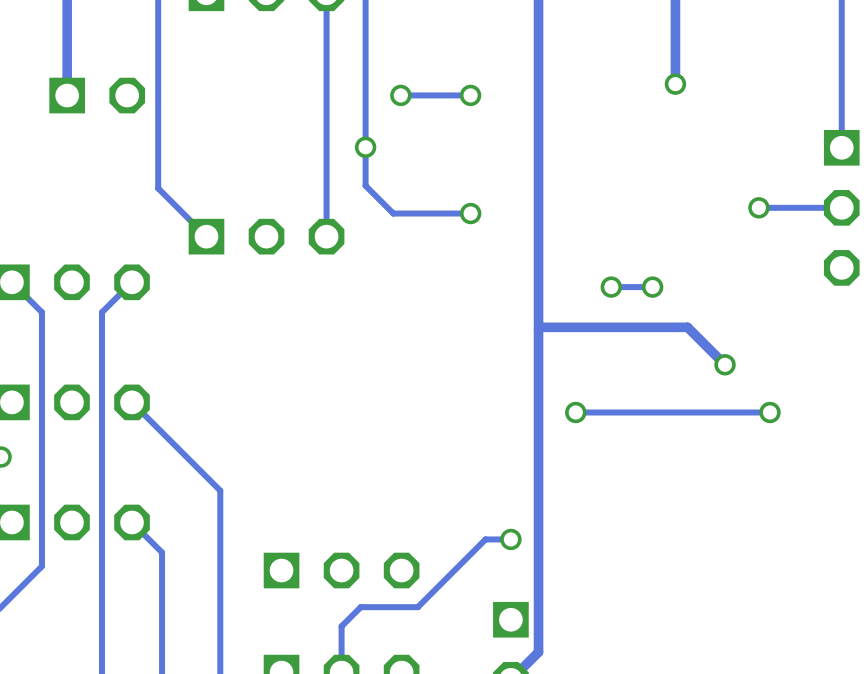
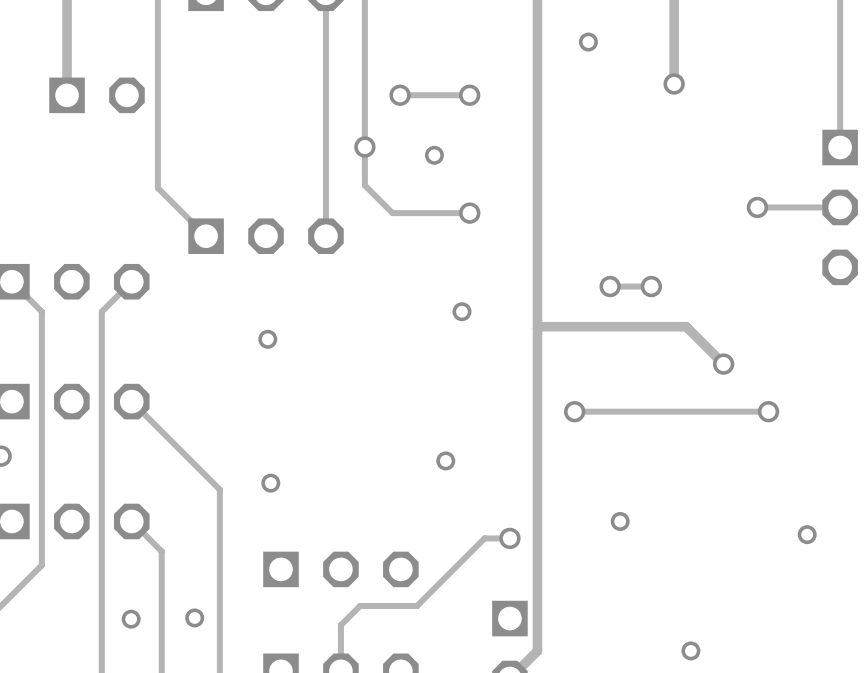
via: none -> (588, 42)
via: none -> (434, 155)
via: none -> (461, 311)
via: none -> (267, 339)
via: none -> (445, 460)
via: none -> (270, 483)
via: none -> (620, 521)
via: none -> (807, 534)
via: none -> (194, 617)
via: none -> (131, 619)
via: none -> (690, 650)

